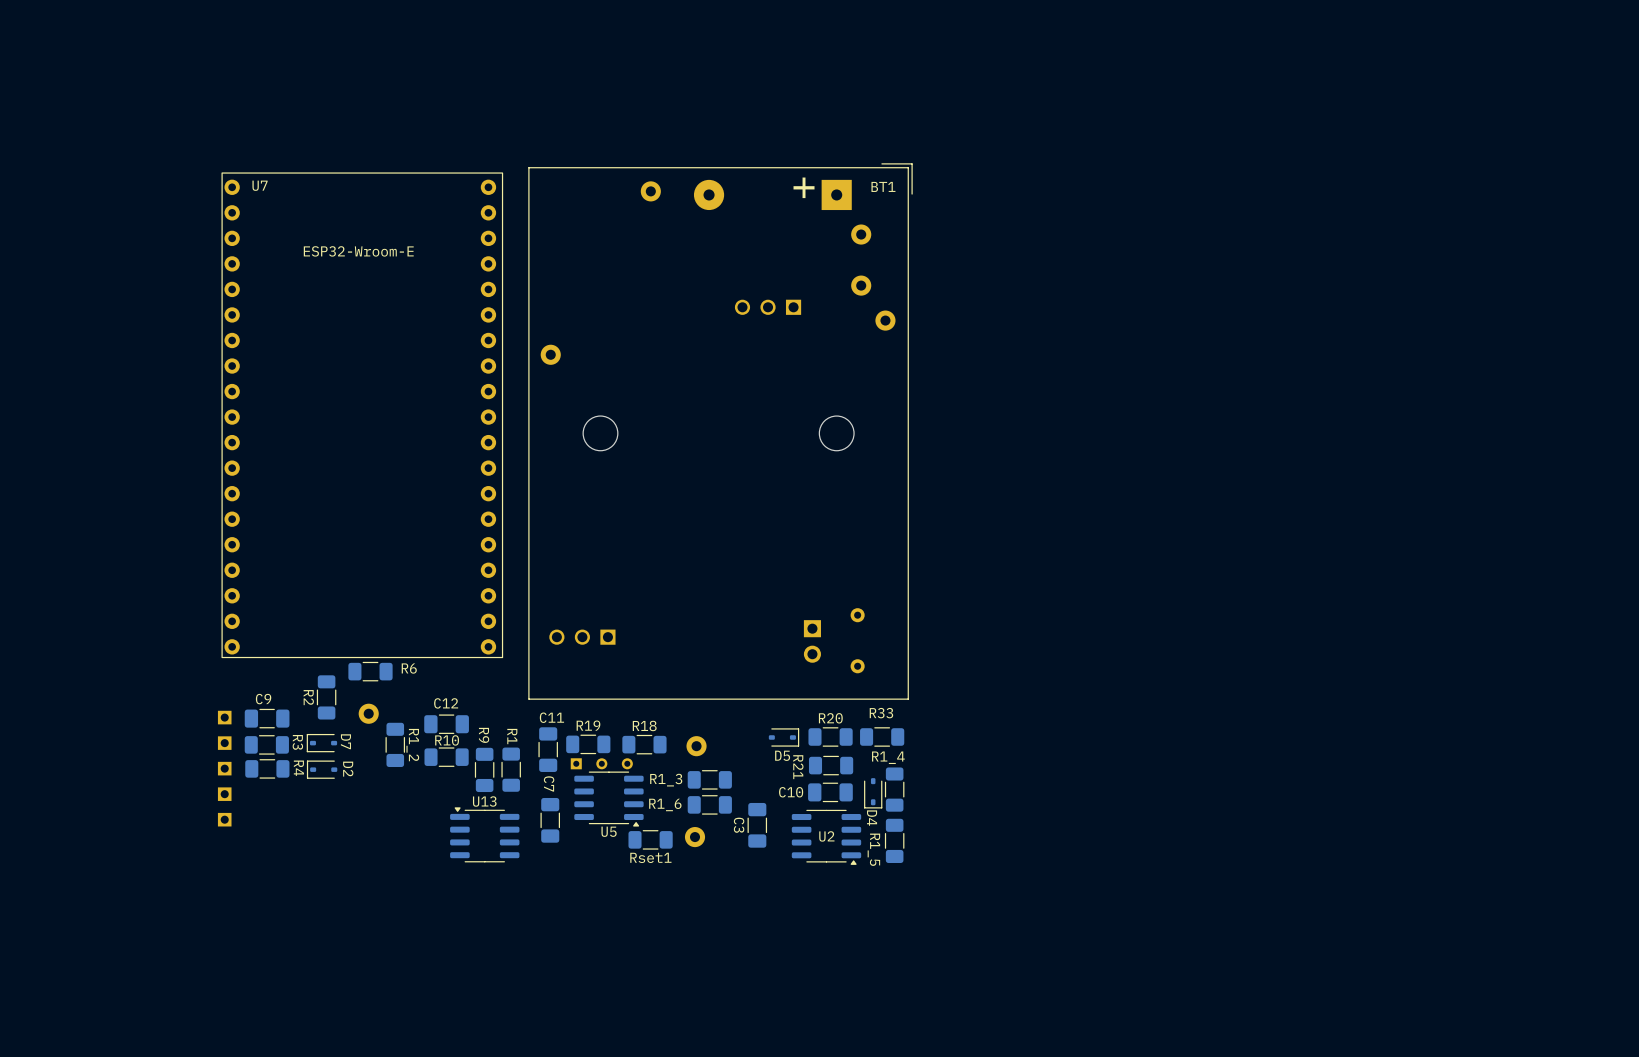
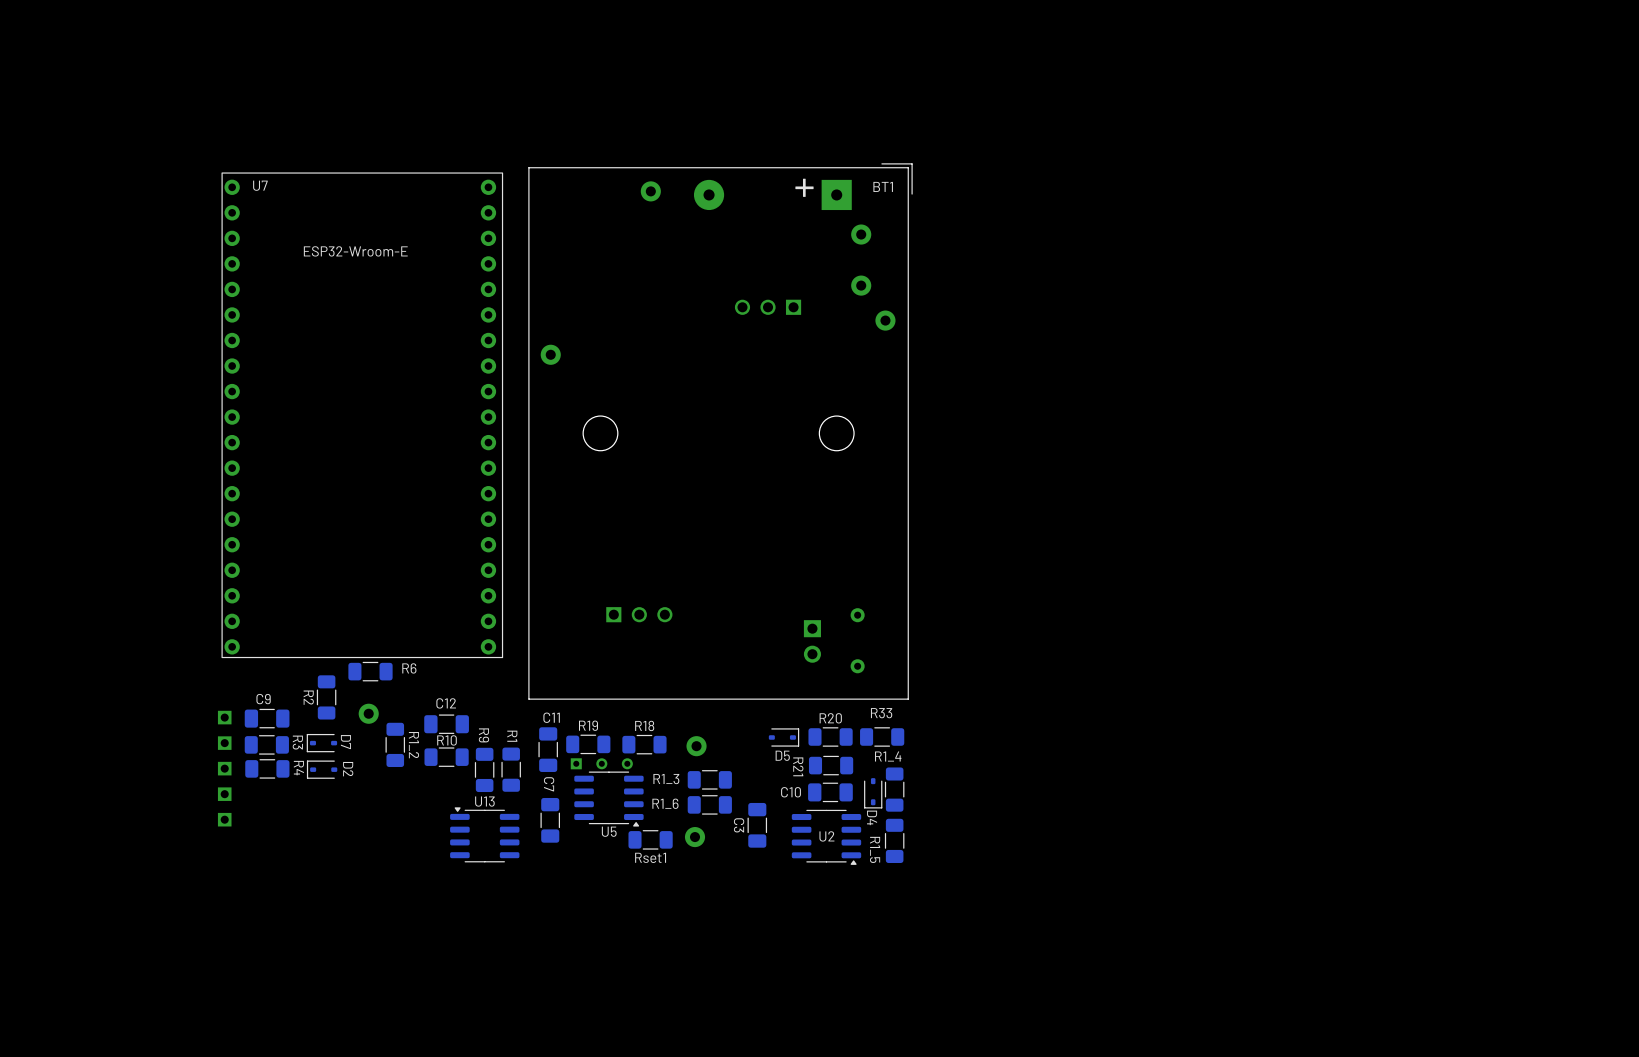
part rotation: 0° (582, 637) -> 180° (639, 614)
part position: (582, 637) -> (639, 614)

